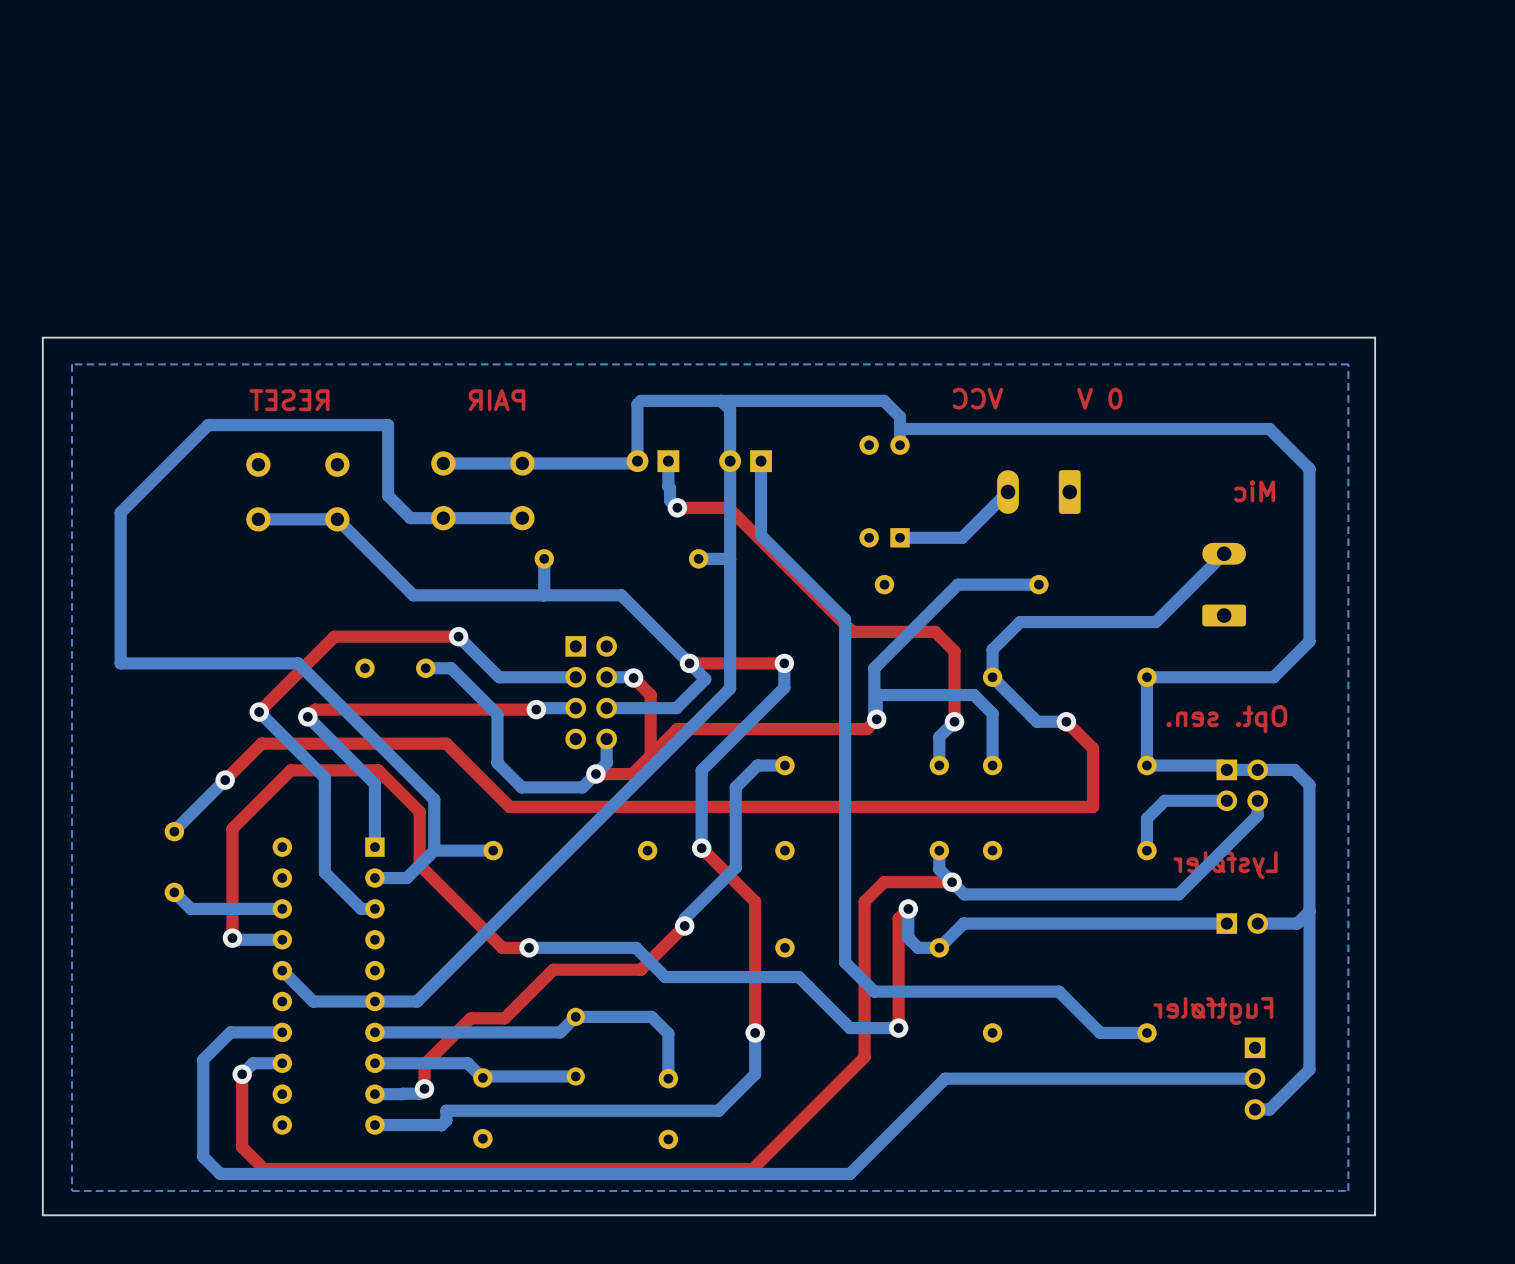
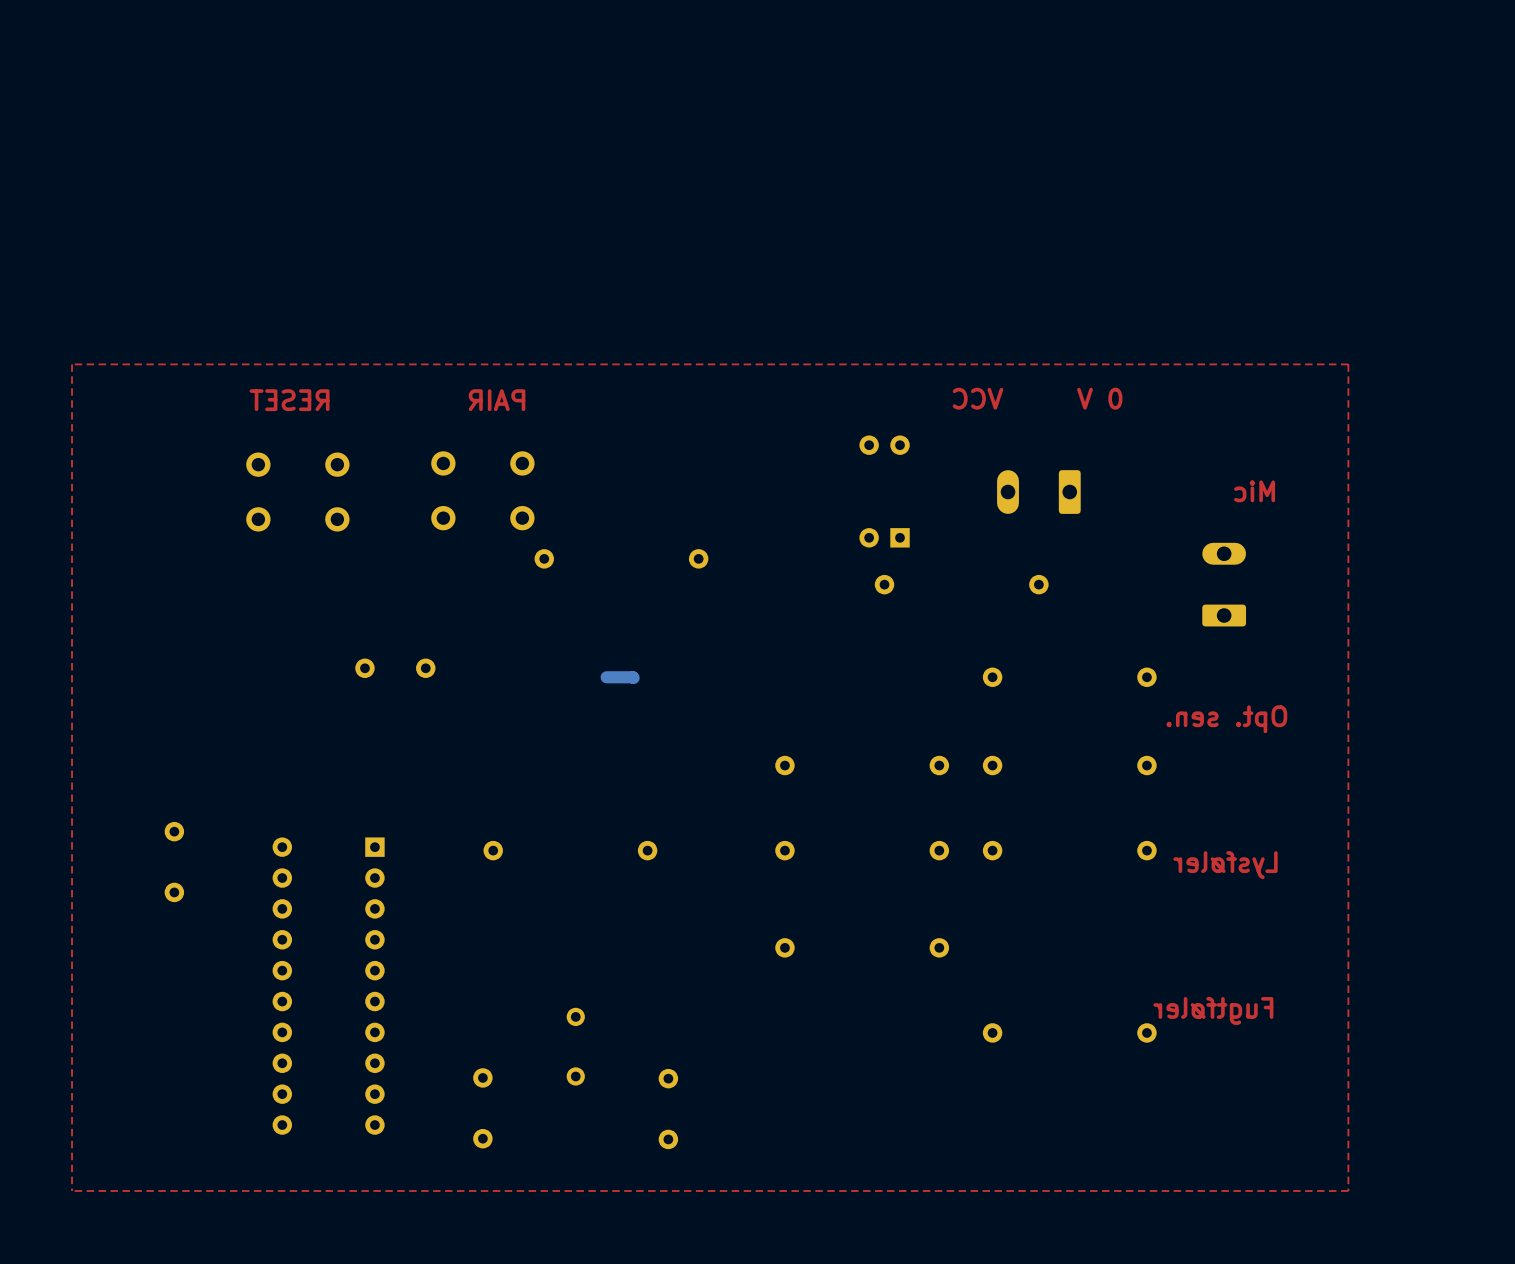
board edge: (1375, 337) (42, 337) (42, 1215) (1375, 1215) (1375, 337) -> none
bottom zone outline: (1348, 364) (1348, 1190) (72, 1190) (72, 364) (1348, 364) -> none
bottom track: (721, 400) (730, 409) (730, 688) (417, 1001) (313, 1001) (282, 970) -> none
bottom track: (900, 428) (1269, 428) (1309, 468) (1309, 641) (1273, 677) (1146, 677) (1146, 765) (1222, 765) (1226, 769) (1294, 769) (1309, 784) (1309, 1069) (1269, 1109) (1255, 1109) -> none
bottom track: (900, 445) (900, 416) (884, 400) (640, 400) (637, 404) (637, 461) (635, 463) (443, 463) -> none
part: (652, 461) -> none
bottom track: (668, 461) (670, 500) (677, 507) -> none
part: (745, 461) -> none
bottom track: (761, 461) (761, 535) (845, 619) (845, 962) (874, 991) (1059, 991) (1100, 1032) (1146, 1032) -> none
bottom track: (1008, 492) (962, 537) (900, 537) -> none
top track: (677, 507) (728, 507) (852, 631) (935, 631) (954, 651) (954, 721) -> none
via: (677, 507) -> none
bottom track: (522, 518) (410, 518) (388, 495) (388, 425) (208, 425) (120, 512) (120, 663) (298, 663) (434, 799) (434, 850) -> none
bottom track: (258, 519) (337, 519) (413, 595) (621, 595) (705, 679) (676, 708) (606, 708) -> none
bottom track: (1224, 553) (1155, 622) (1020, 622) (992, 649) (992, 677) (1032, 716) -> none
bottom track: (544, 558) (543, 595) -> none
bottom track: (698, 558) (730, 559) -> none
bottom track: (1038, 584) (957, 584) (874, 668) (874, 719) (876, 719) (876, 695) (973, 695) (992, 713) (992, 765) -> none
top track: (458, 636) (334, 636) (259, 712) -> none
bottom track: (458, 636) (499, 677) (575, 677) -> none
via: (458, 636) -> none
via: (689, 663) -> none
top track: (784, 663) (689, 663) -> none
bottom track: (784, 663) (784, 687) (701, 770) (701, 848) -> none
via: (784, 663) -> none
bottom track: (425, 668) (451, 668) (497, 714) (497, 763) (521, 787) (582, 787) (606, 763) (606, 739) -> none
top track: (633, 678) (650, 695) (650, 755) -> none
via: (633, 678) -> none
part: (591, 692) -> none
bottom track: (575, 708) (536, 709) -> none
top track: (536, 709) (315, 709) (307, 716) -> none
via: (536, 709) -> none
bottom track: (259, 712) (324, 777) (324, 872) (361, 908) (374, 908) -> none
via: (259, 712) -> none
bottom track: (307, 716) (374, 784) (374, 847) -> none
via: (307, 716) -> none
bottom track: (1032, 716) (1037, 721) (1066, 721) -> none
top track: (876, 719) (867, 729) (677, 729) (632, 774) (595, 774) -> none
via: (876, 719) -> none
bottom track: (954, 721) (939, 736) (939, 765) -> none
via: (954, 721) -> none
top track: (1066, 721) (1093, 748) (1093, 806) (509, 806) (446, 743) (261, 743) (225, 780) -> none
via: (1066, 721) -> none
bottom track: (784, 765) (757, 765) (735, 787) (735, 867) (684, 918) (684, 925) -> none
via: (595, 774) -> none
bottom track: (225, 780) (174, 831) -> none
via: (225, 780) -> none
part: (1242, 785) -> none
bottom track: (1226, 800) (1164, 800) (1146, 818) (1146, 850) -> none
bottom track: (1257, 800) (1257, 815) (1178, 894) (964, 894) (939, 869) (939, 850) -> none
top track: (701, 848) (755, 901) (755, 1032) -> none
via: (701, 848) -> none
bottom track: (434, 850) (406, 878) (374, 878) -> none
bottom track: (493, 850) (434, 850) -> none
top track: (952, 882) (884, 882) (864, 901) (864, 1057) (752, 1169) (264, 1169) (242, 1147) (242, 1074) -> none
via: (952, 882) -> none
bottom track: (174, 892) (190, 908) (282, 908) -> none
top track: (908, 908) (898, 918) (898, 1028) -> none
bottom track: (908, 908) (908, 938) (918, 947) (939, 947) (963, 923) (1226, 923) -> none
via: (908, 908) -> none
bottom track: (1309, 911) (1297, 923) (1257, 923) -> none
part: (1242, 923) -> none
top track: (684, 925) (640, 969) (553, 969) (504, 1018) (470, 1018) (424, 1064) (424, 1088) -> none
via: (684, 925) -> none
top track: (232, 938) (232, 828) (290, 770) (378, 770) (419, 811) (419, 865) (502, 947) (529, 947) -> none
bottom track: (232, 938) (234, 939) (282, 939) -> none
via: (232, 938) -> none
bottom track: (529, 947) (636, 947) (665, 977) (798, 977) (849, 1028) (898, 1028) -> none
via: (529, 947) -> none
via: (898, 1028) -> none
bottom track: (282, 1032) (230, 1032) (203, 1059) (203, 1156) (220, 1173) (849, 1173) (945, 1078) (1255, 1078) -> none
bottom track: (374, 1032) (560, 1032) (575, 1016) (651, 1016) (668, 1033) (668, 1078) -> none
bottom track: (755, 1032) (755, 1074) (718, 1110) (446, 1110) (446, 1120) (441, 1125) (374, 1125) -> none
via: (755, 1032) -> none
bottom track: (282, 1063) (253, 1063) (242, 1074) -> none
bottom track: (374, 1063) (467, 1063) (483, 1078) (485, 1076) (575, 1076) -> none
via: (242, 1074) -> none
part: (1255, 1078) -> none
bottom track: (424, 1088) (419, 1093) (374, 1094) -> none
via: (424, 1088) -> none

